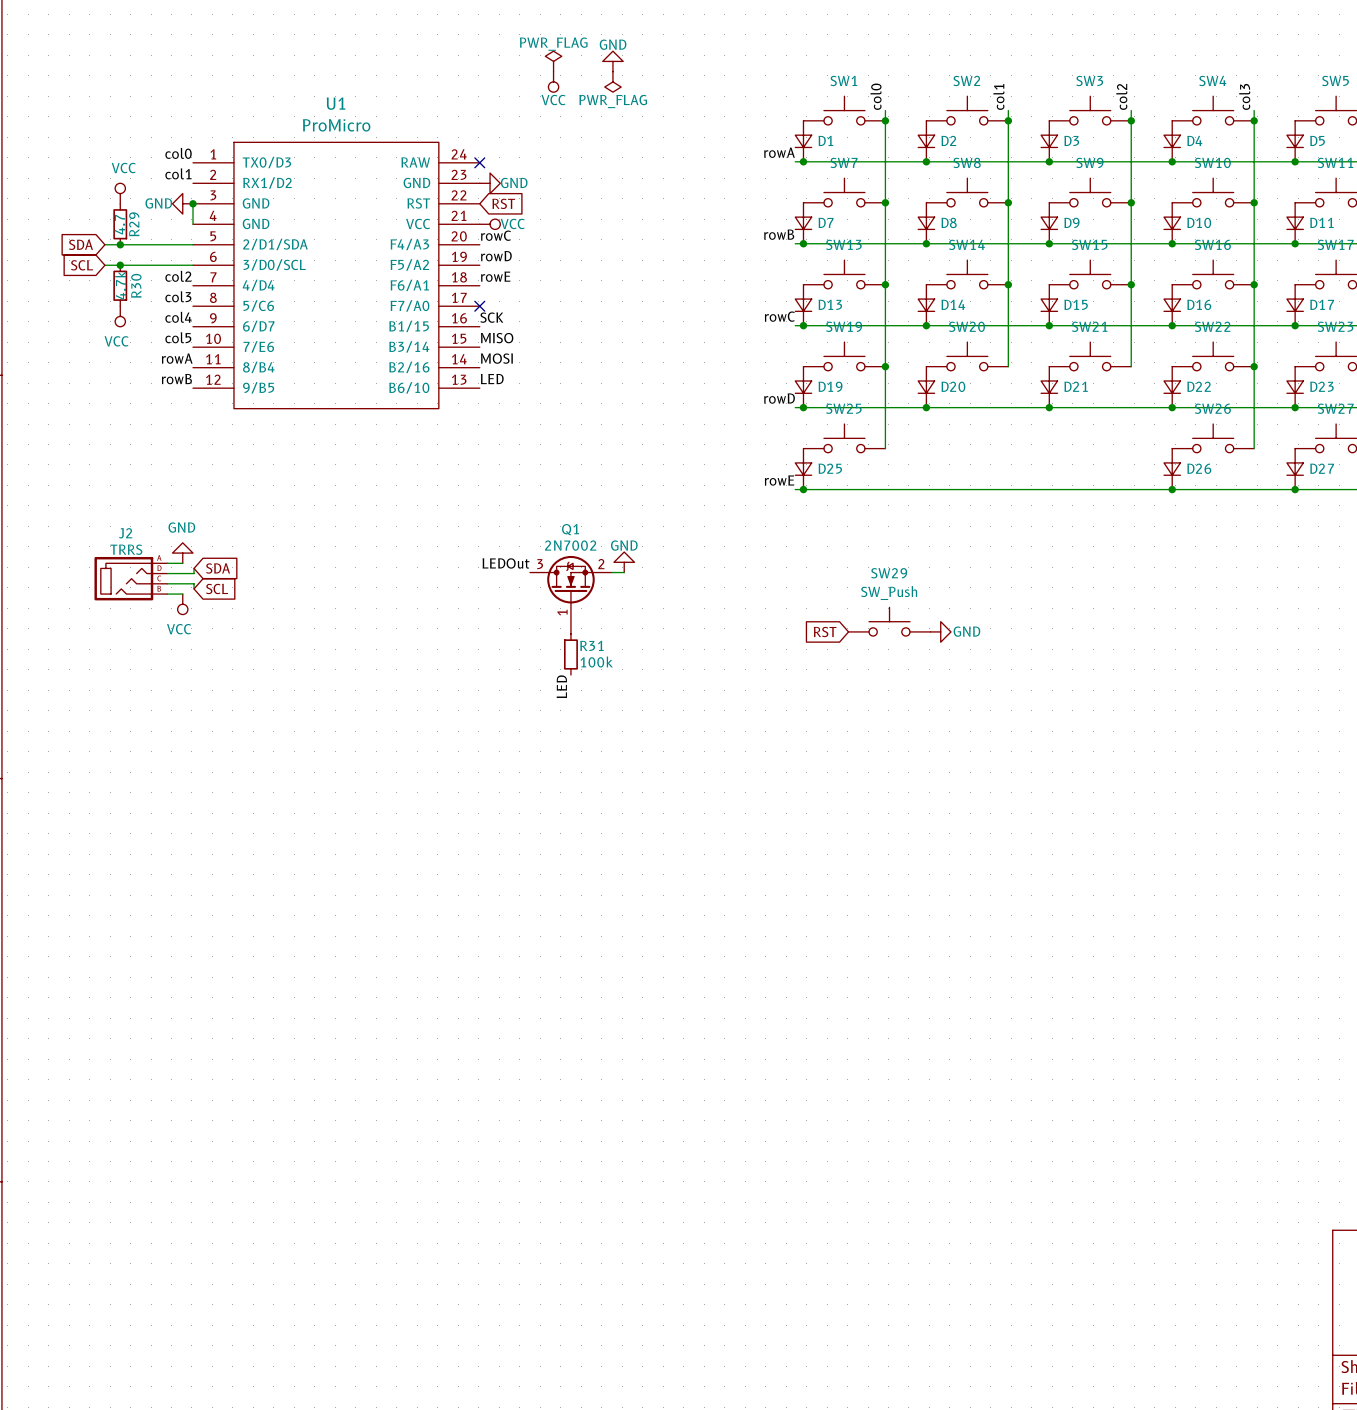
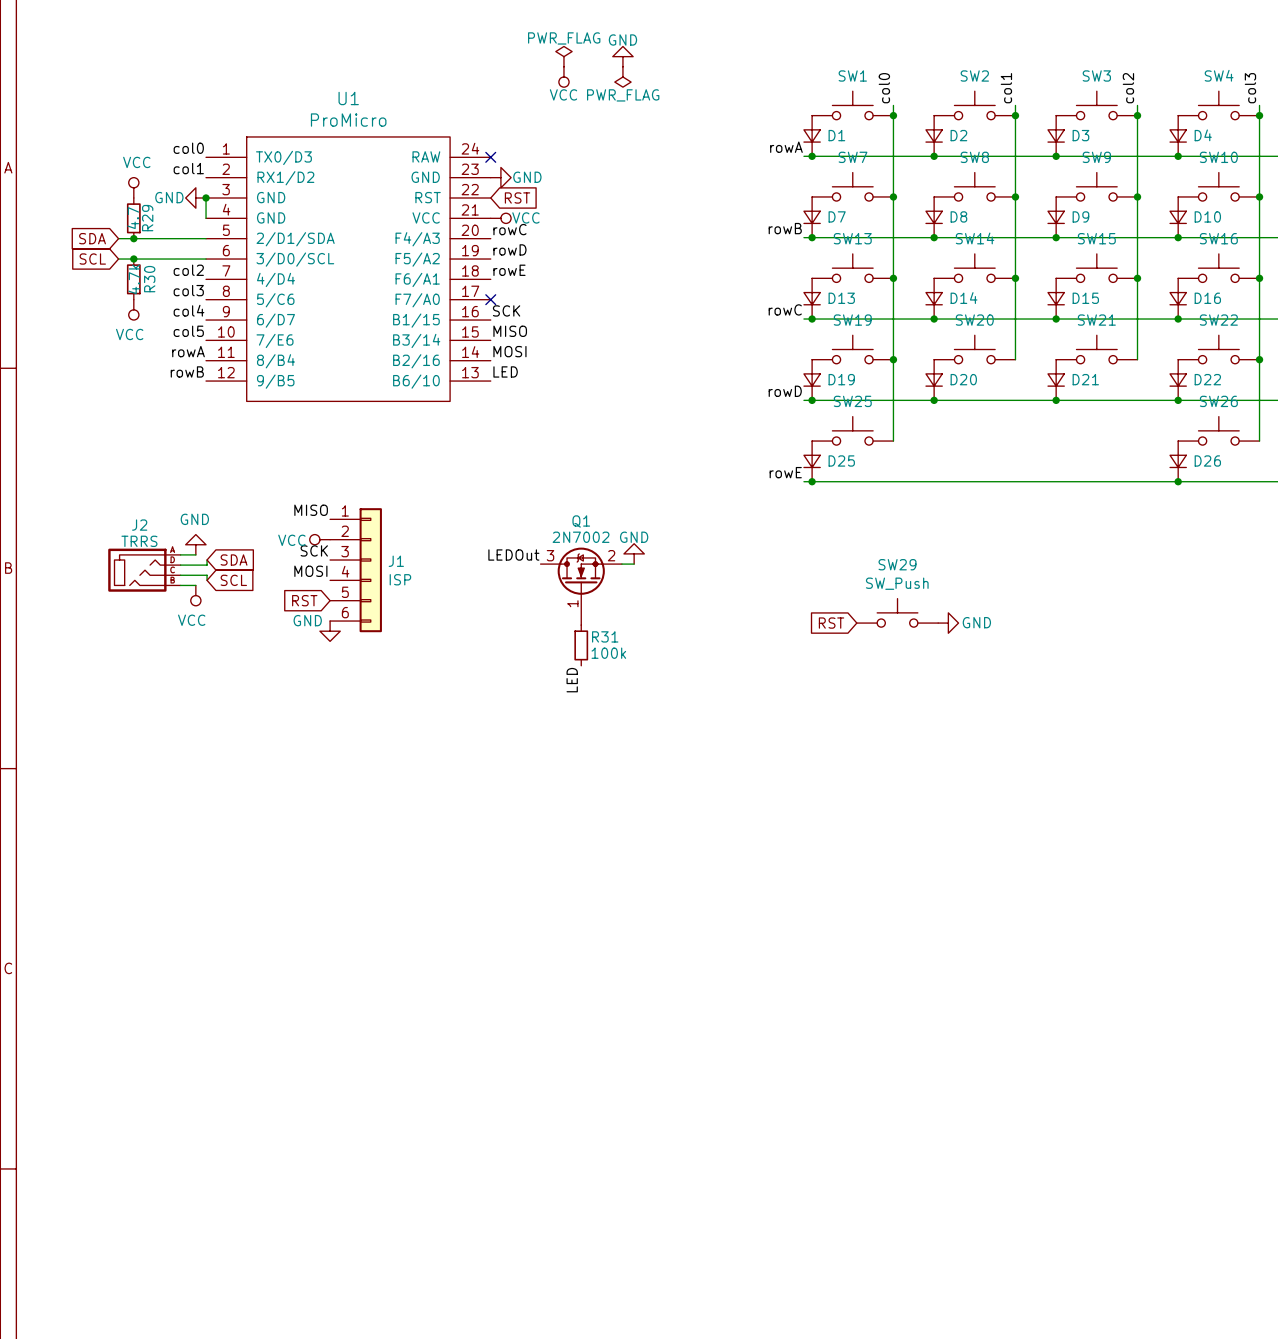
label: none -> MISO (311, 510)
power symbol: none -> VCC (319, 539)
label: none -> SCK (314, 550)
J1: none -> ISP (356, 570)
label: none -> MOSI (310, 571)
global label: none -> RST (304, 600)
power symbol: none -> GND (330, 631)

